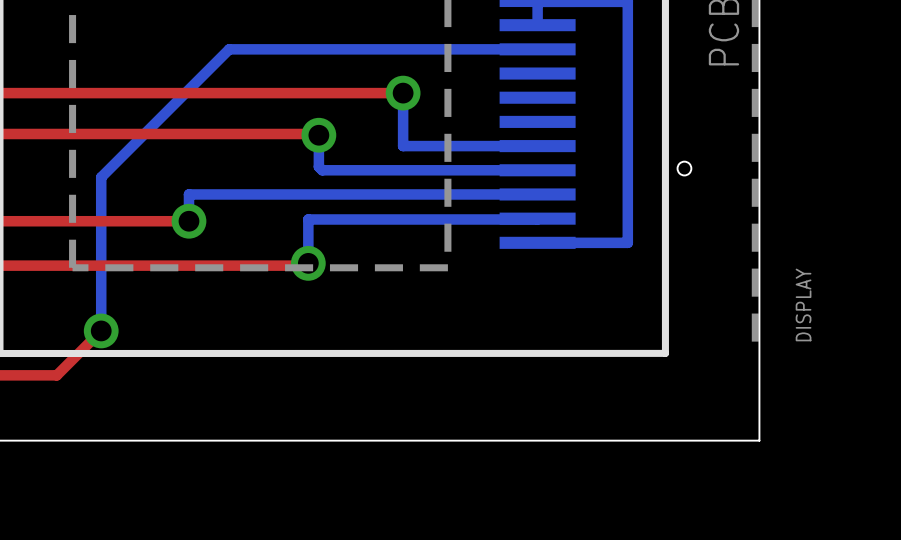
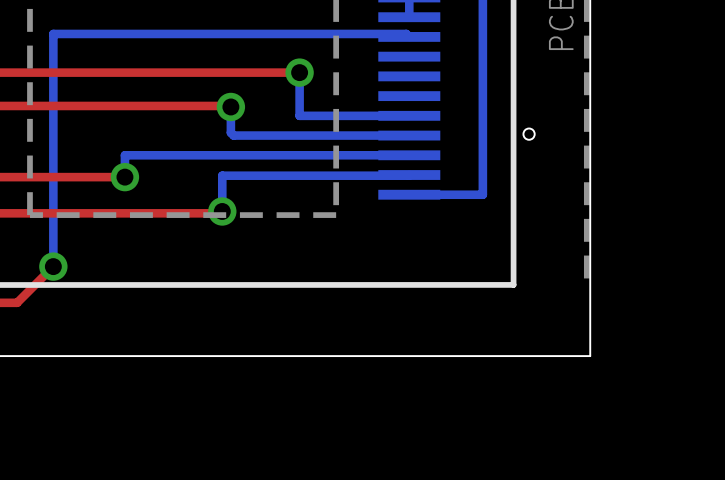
bottom track: (537, 49) (229, 49) (101, 177) -> (409, 36) (406, 33) (53, 33) (53, 141)
part value: DISPLAY (803, 304) -> none

